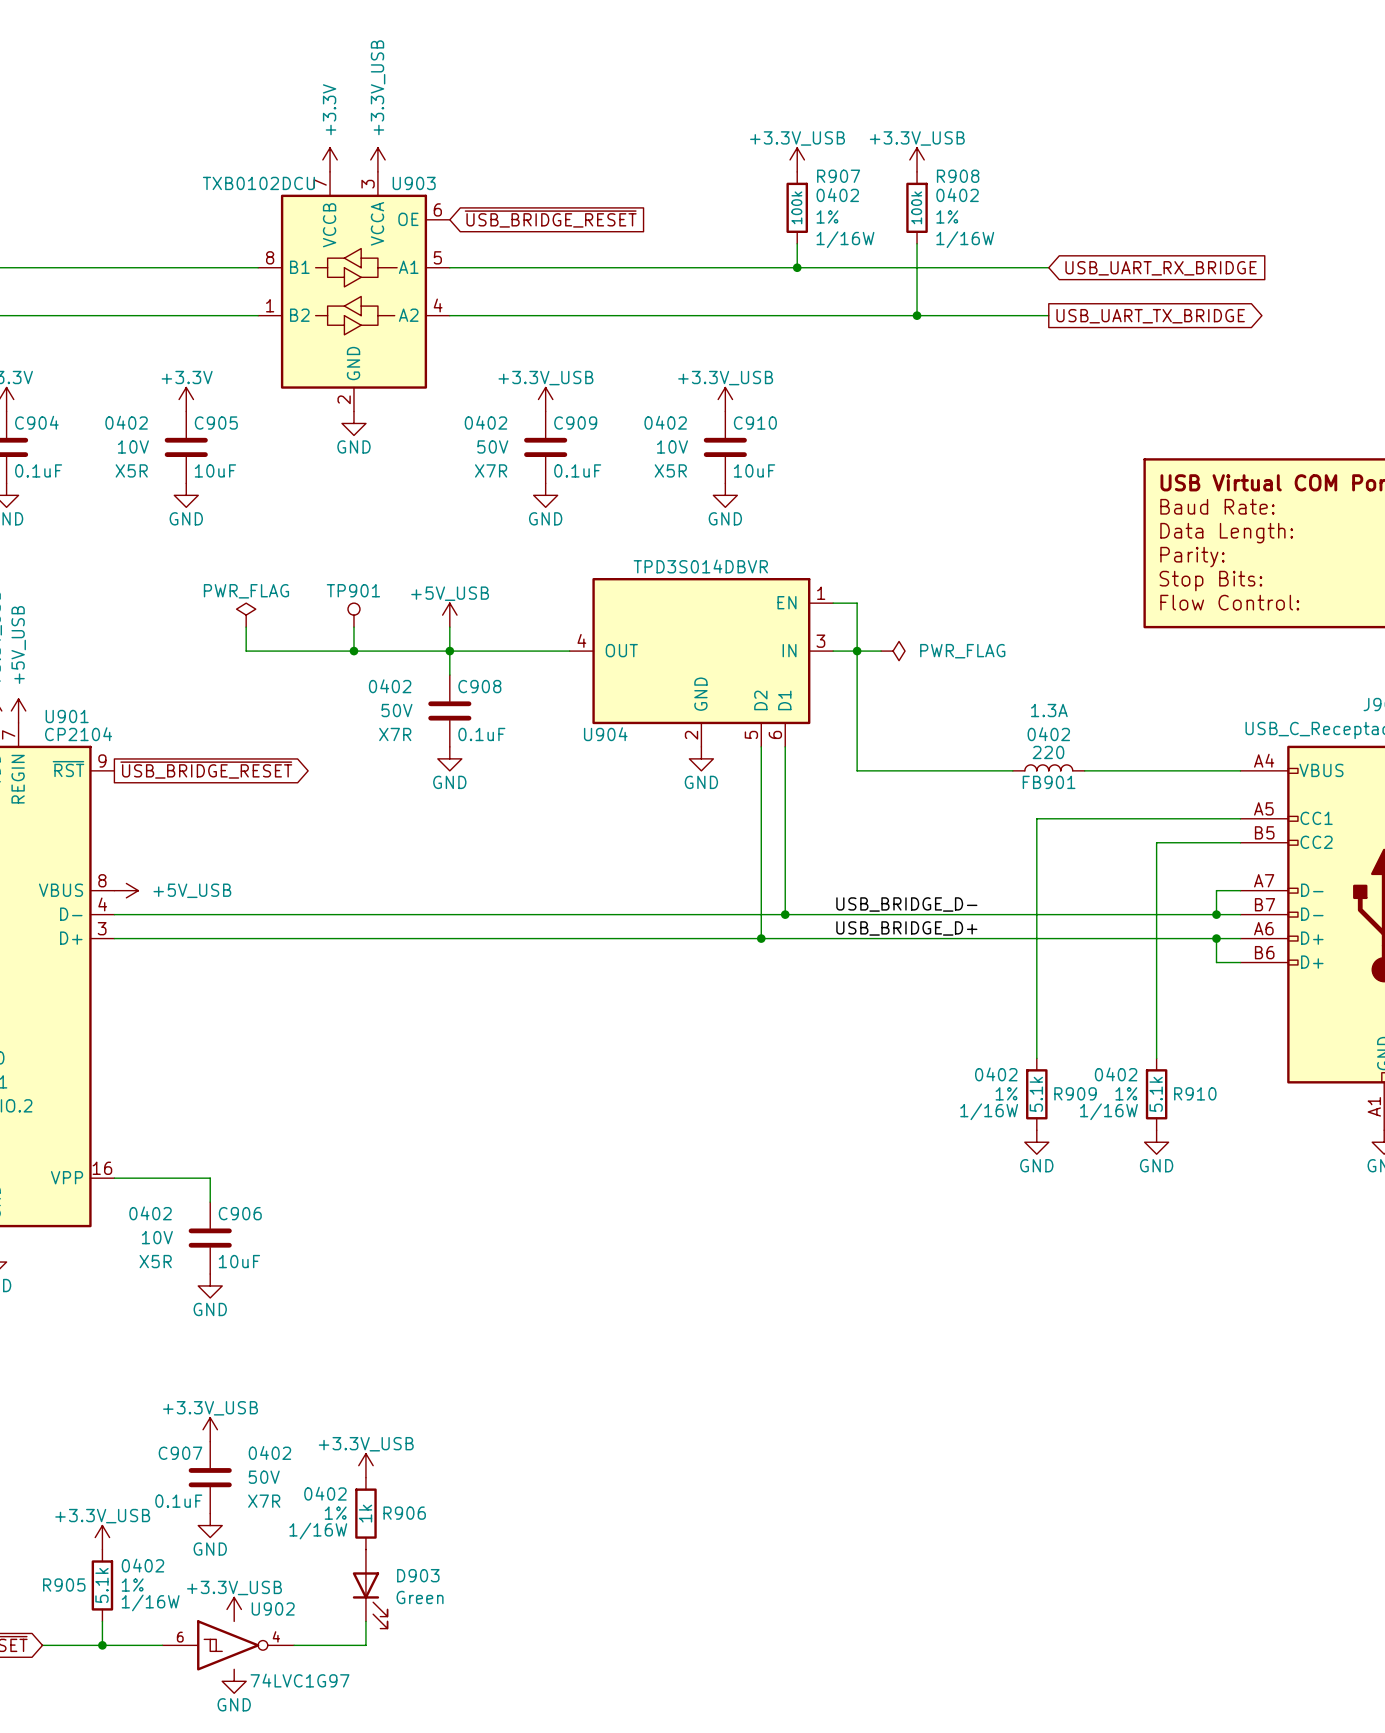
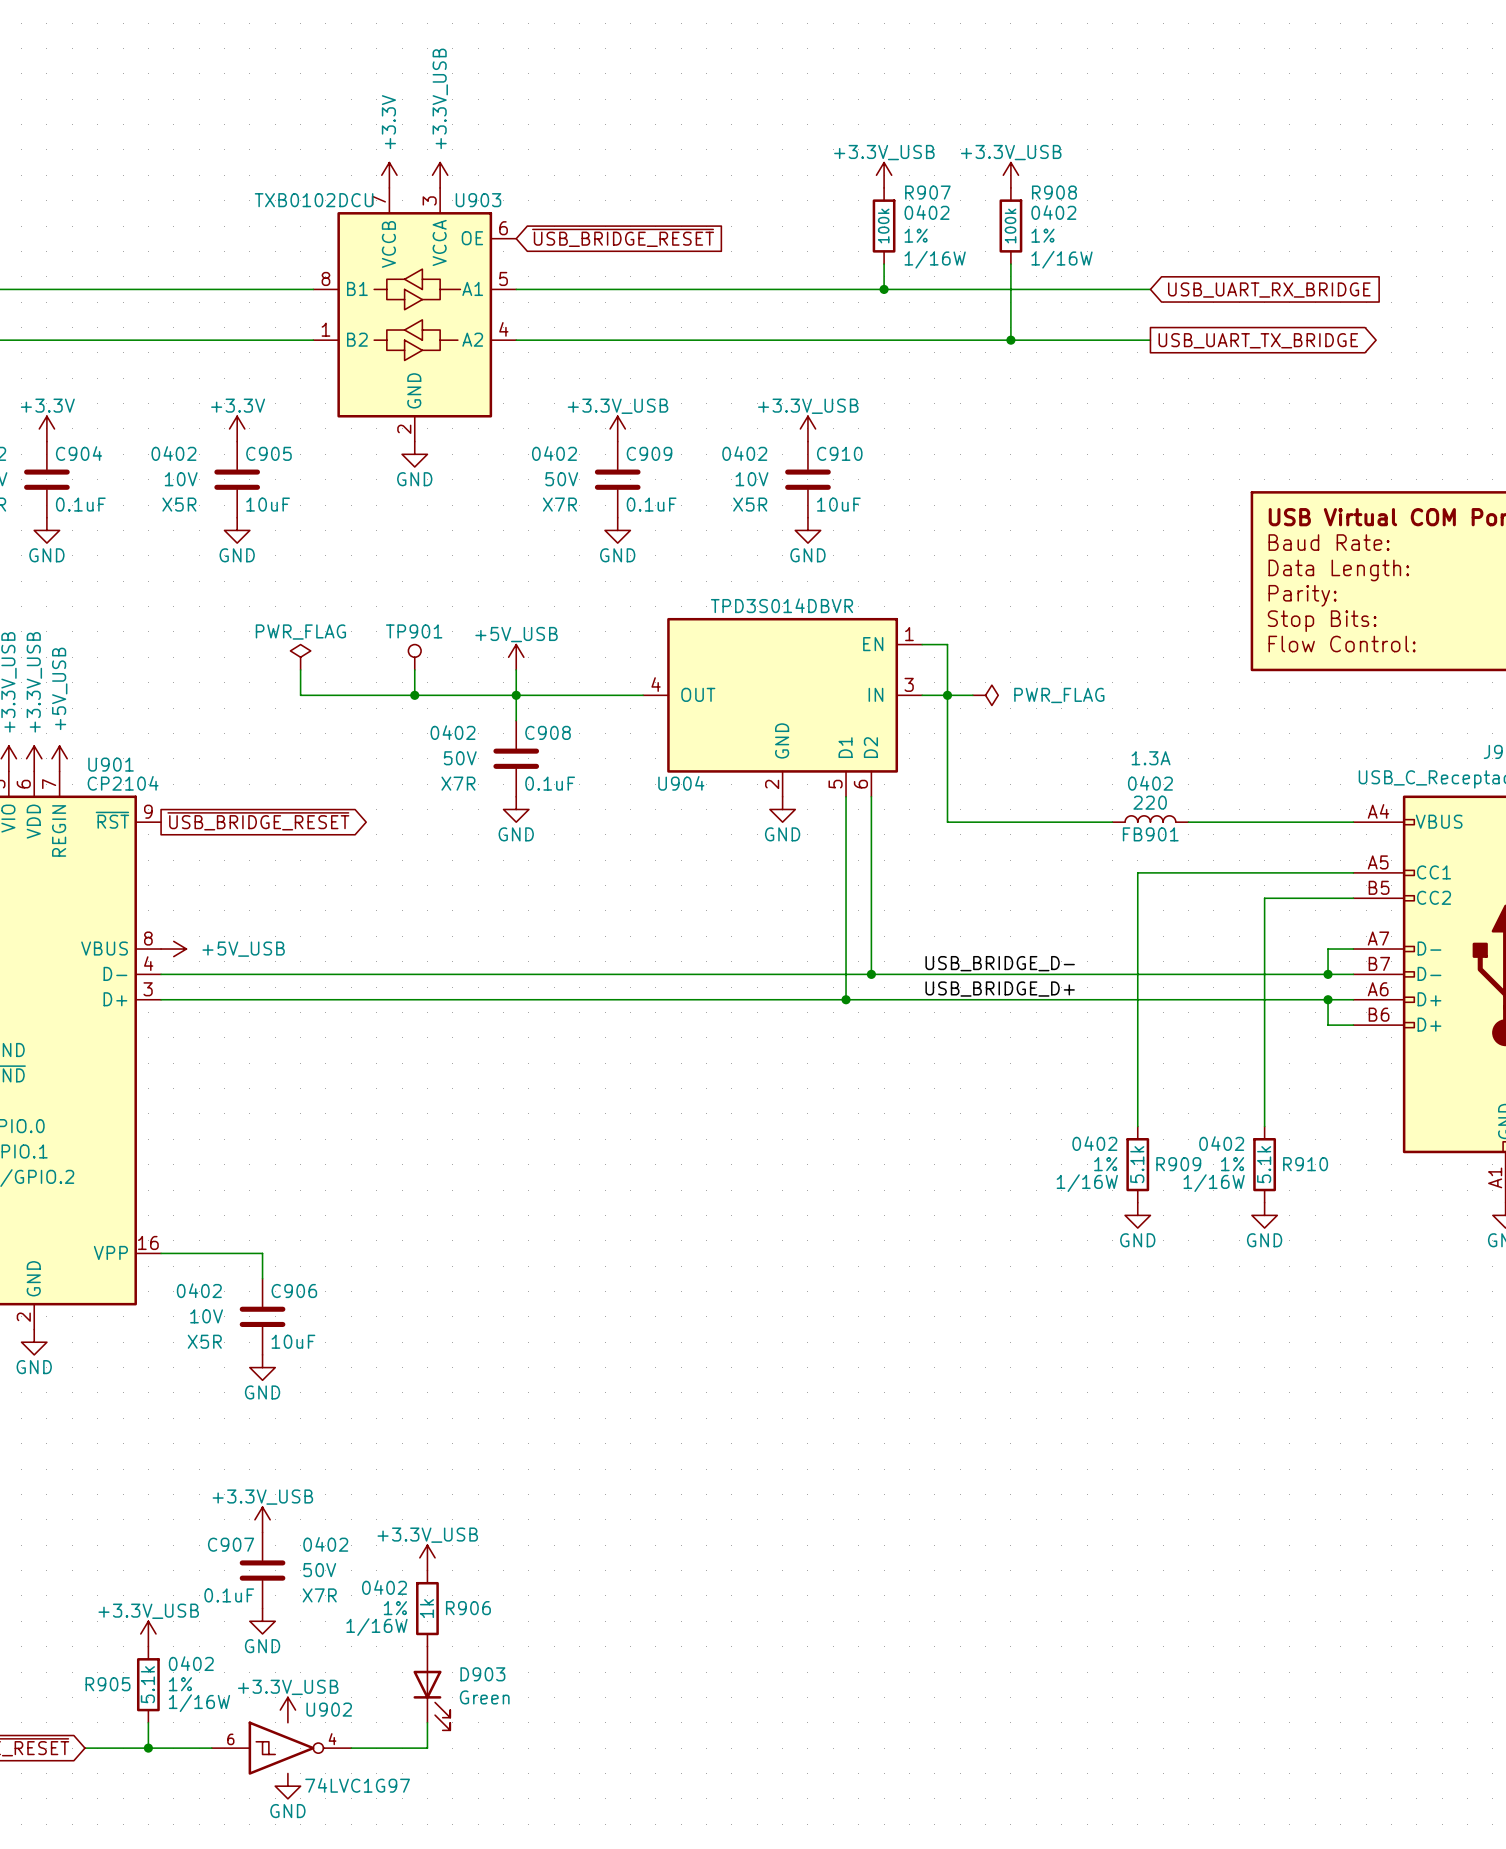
U904 pin name: D2 (760, 700) -> D1 (845, 747)
U904 pin name: D1 (784, 700) -> D2 (870, 747)

